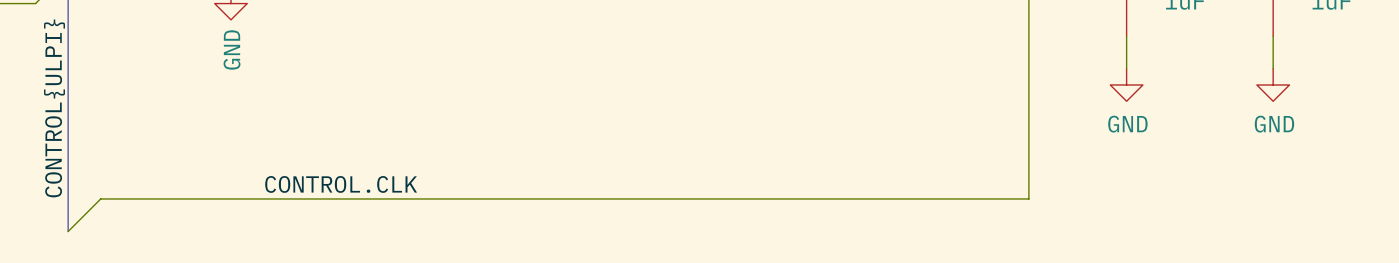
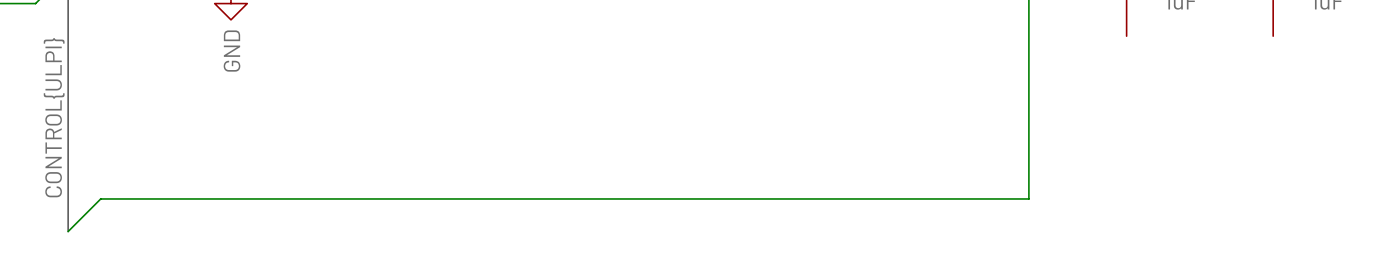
wire: (1126, 36) (1126, 68) -> none
wire: (1273, 36) (1273, 68) -> none
power symbol: GND (1126, 84) -> none
power symbol: GND (1273, 84) -> none
label: CONTROL.CLK (341, 184) -> none

